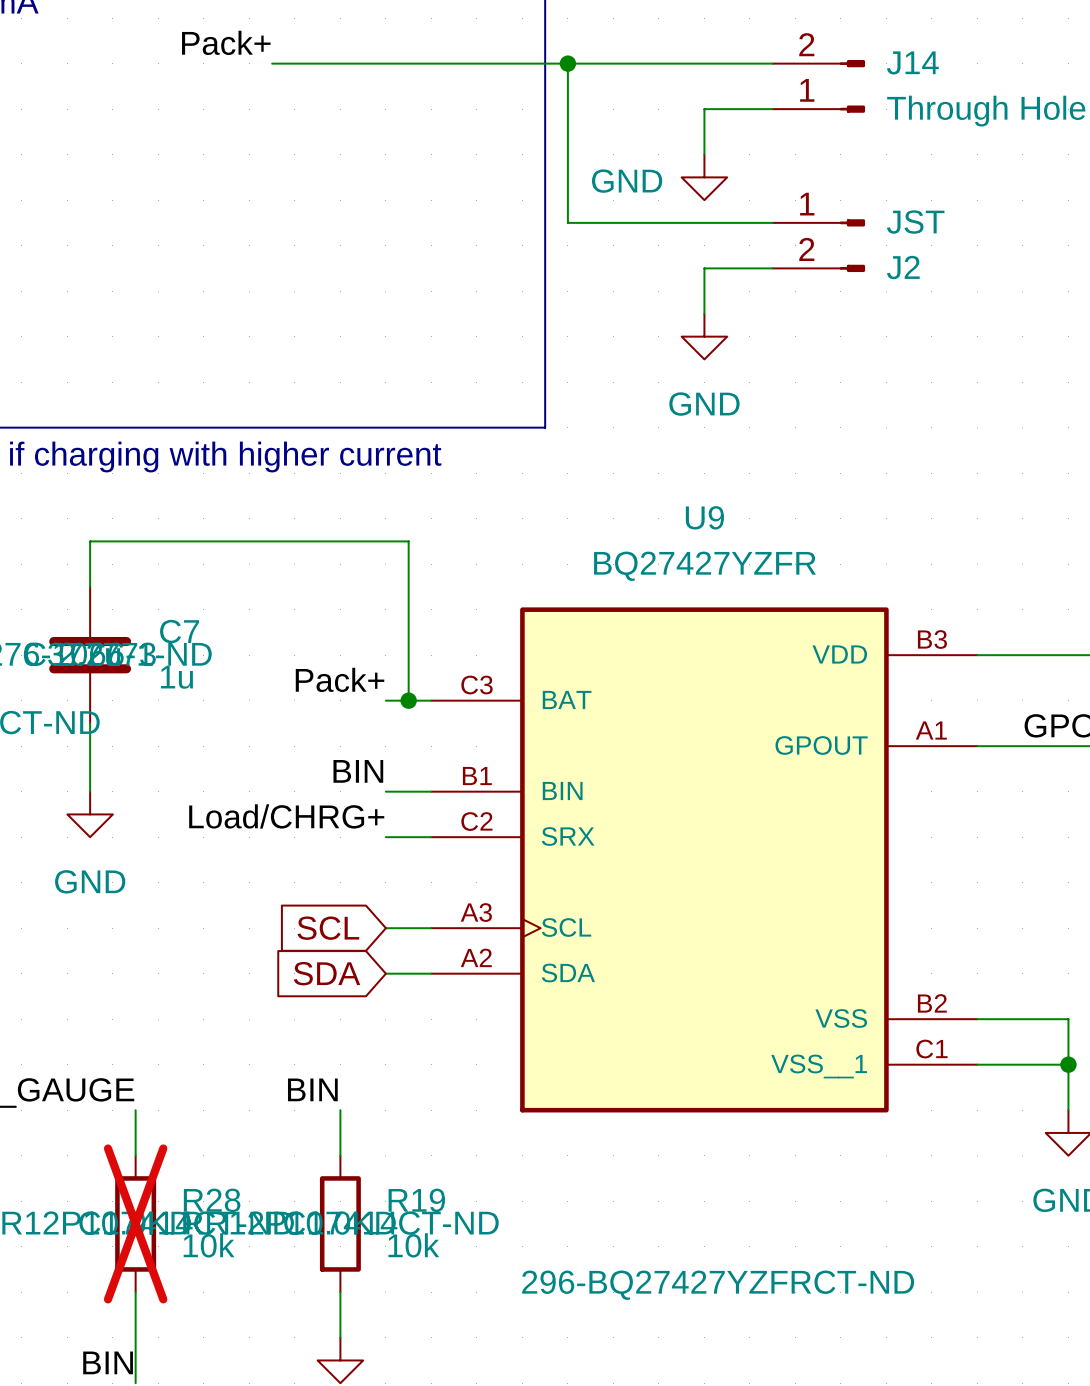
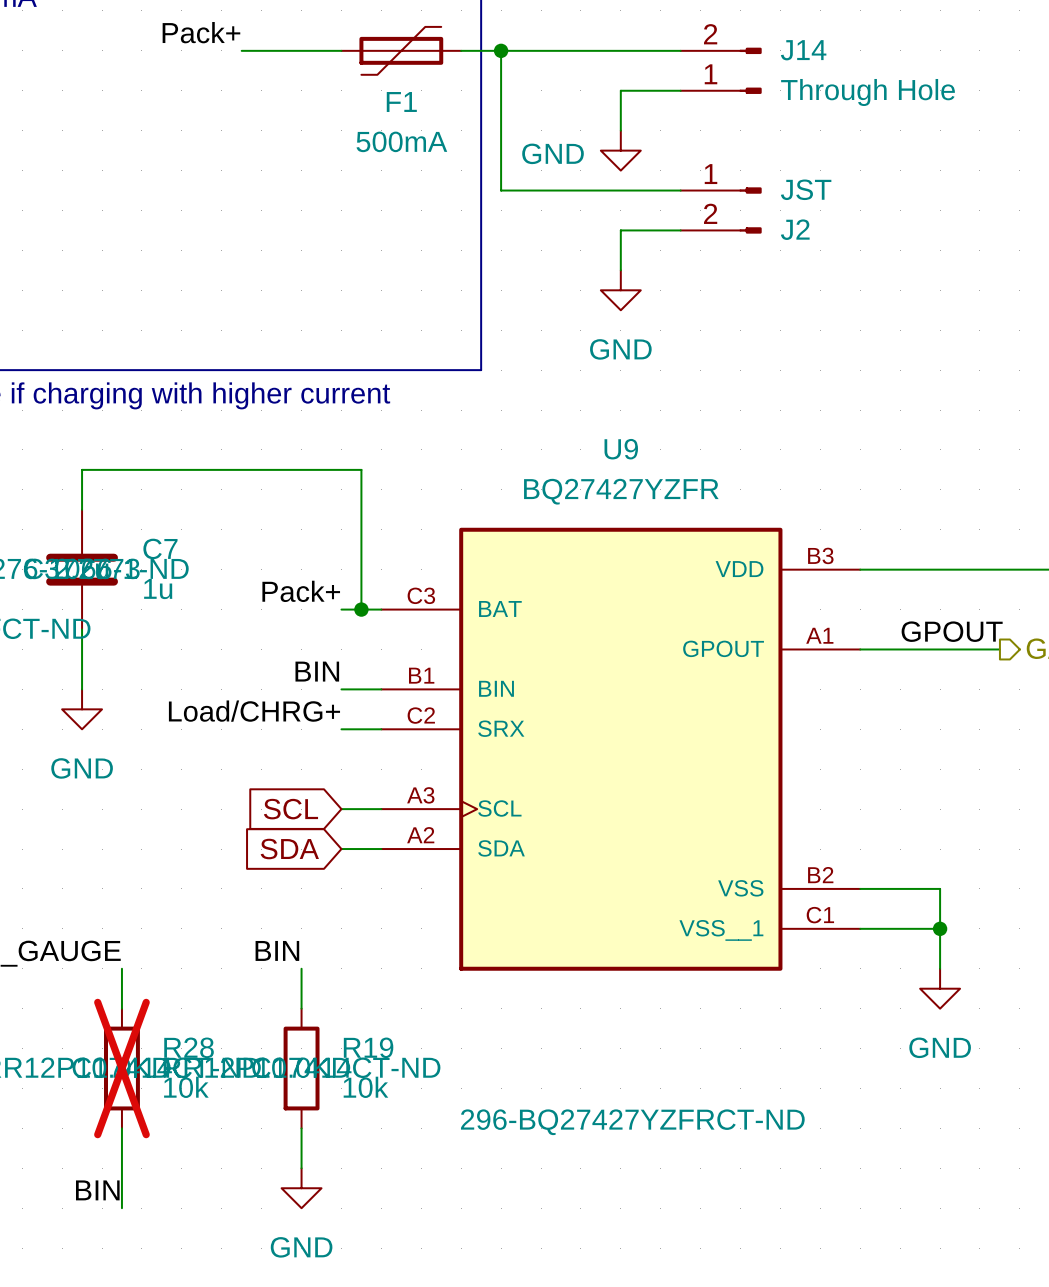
F1: none -> 500mA (401, 50)

